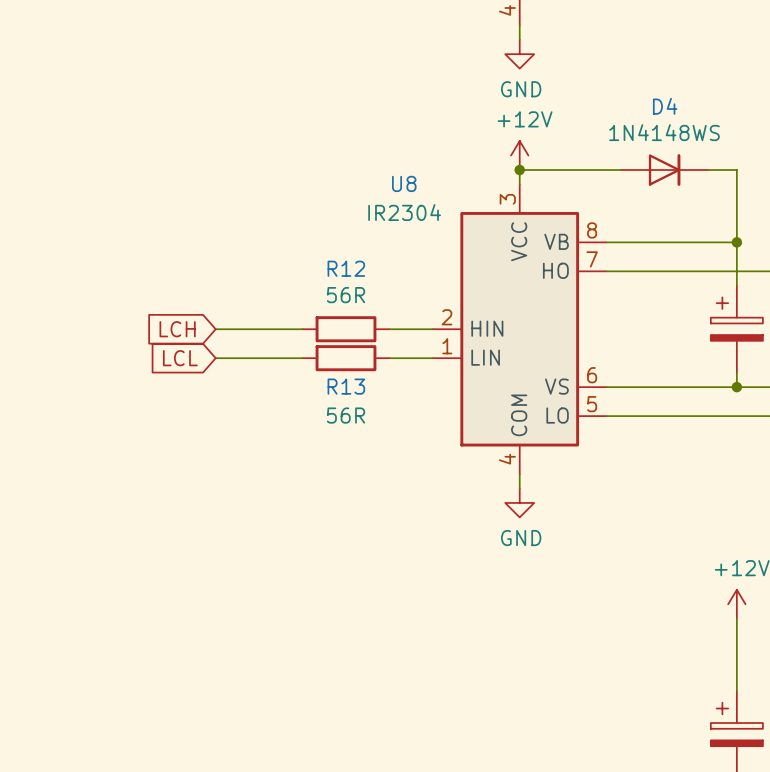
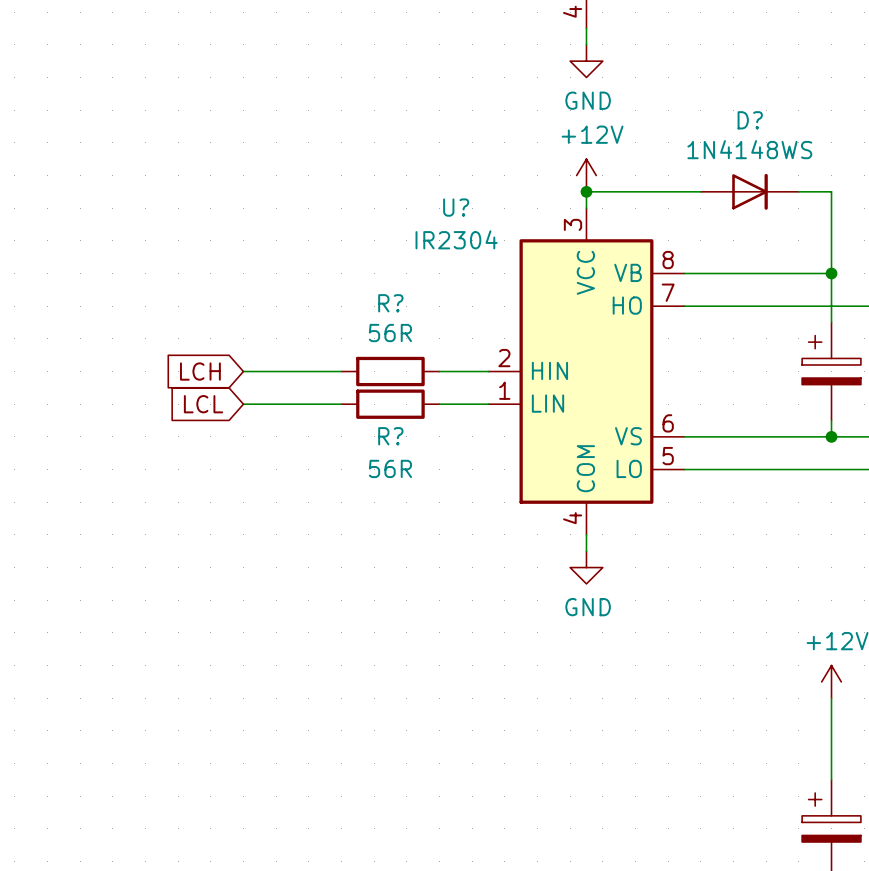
D4 name: D4 (665, 106) -> D? (750, 120)
U8 name: U8 (404, 183) -> U? (456, 207)
R12 name: R12 (346, 268) -> R? (390, 303)
R13 name: R13 (346, 386) -> R? (390, 436)

